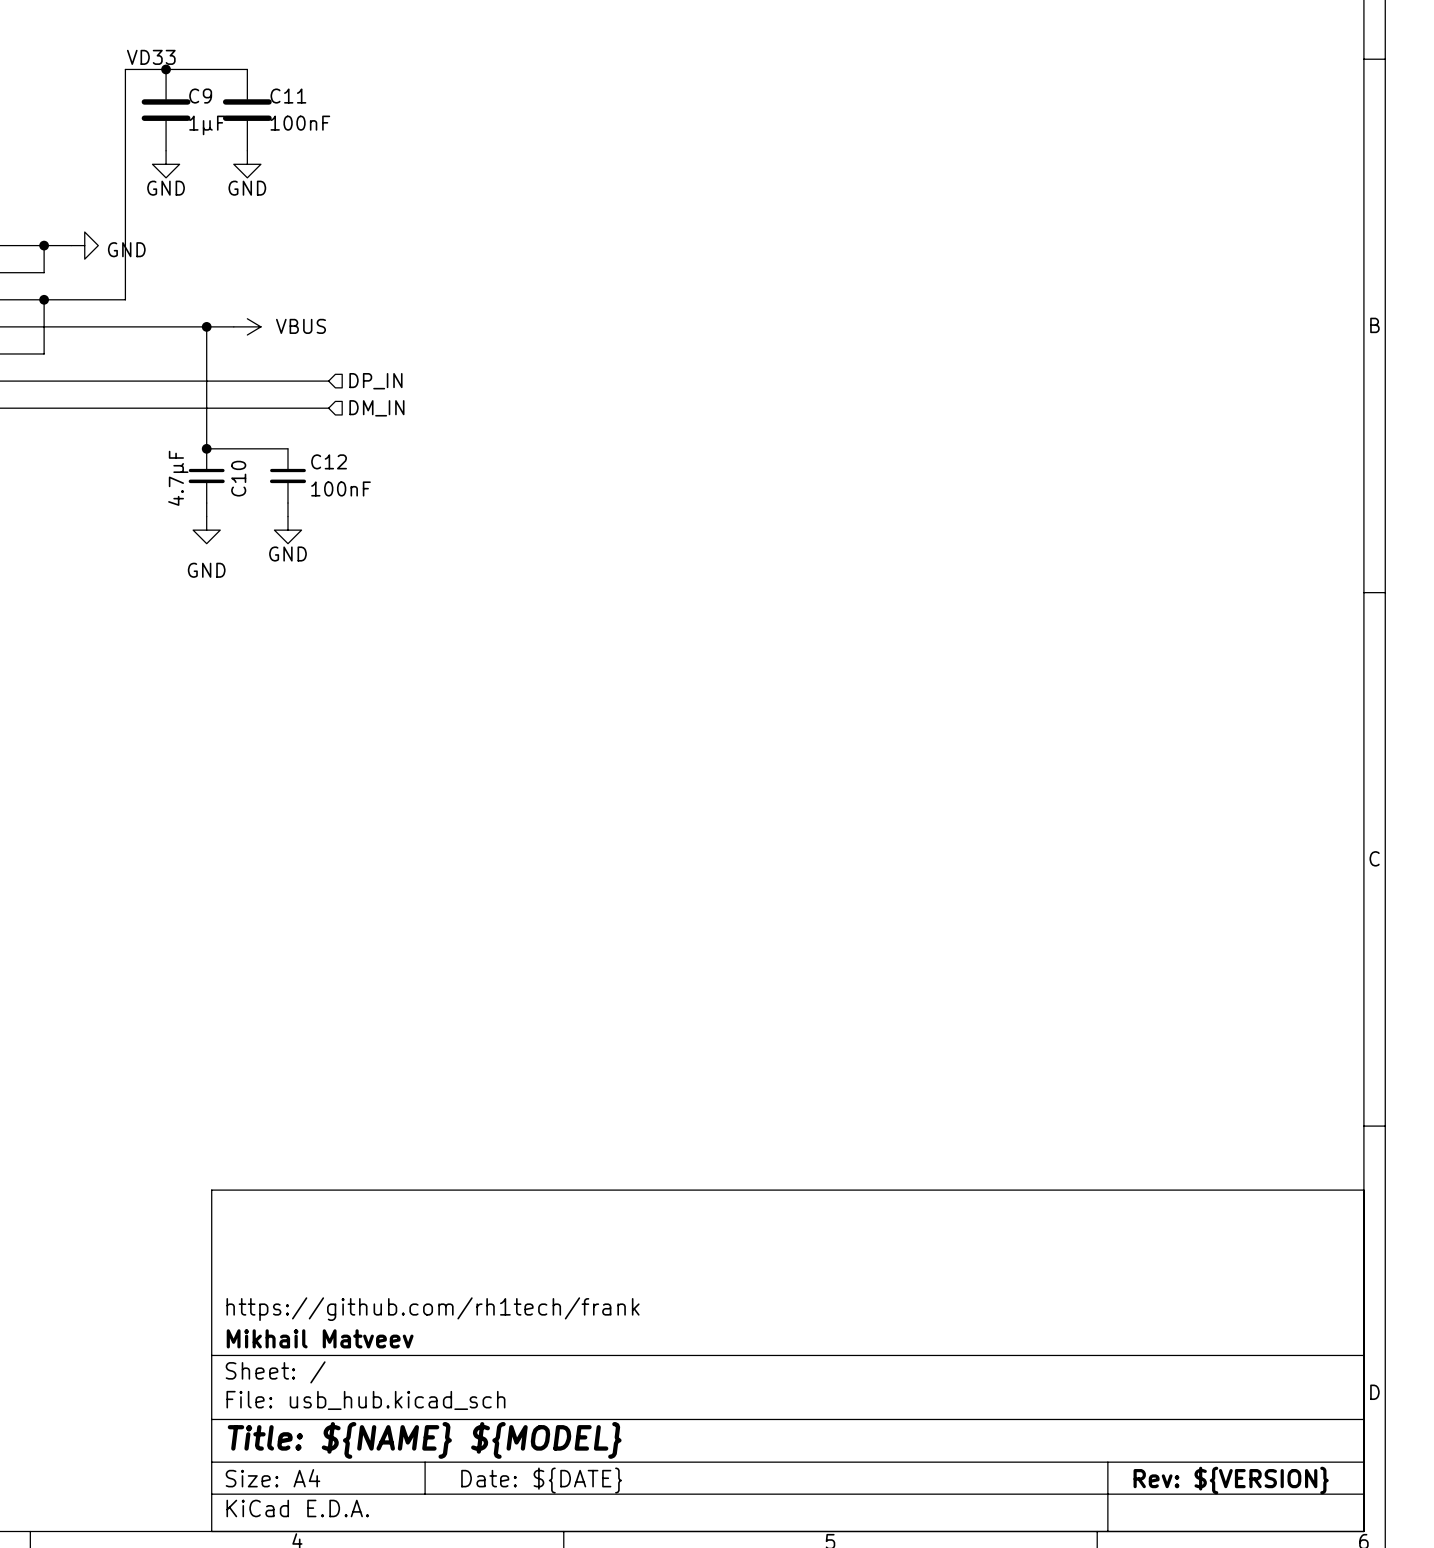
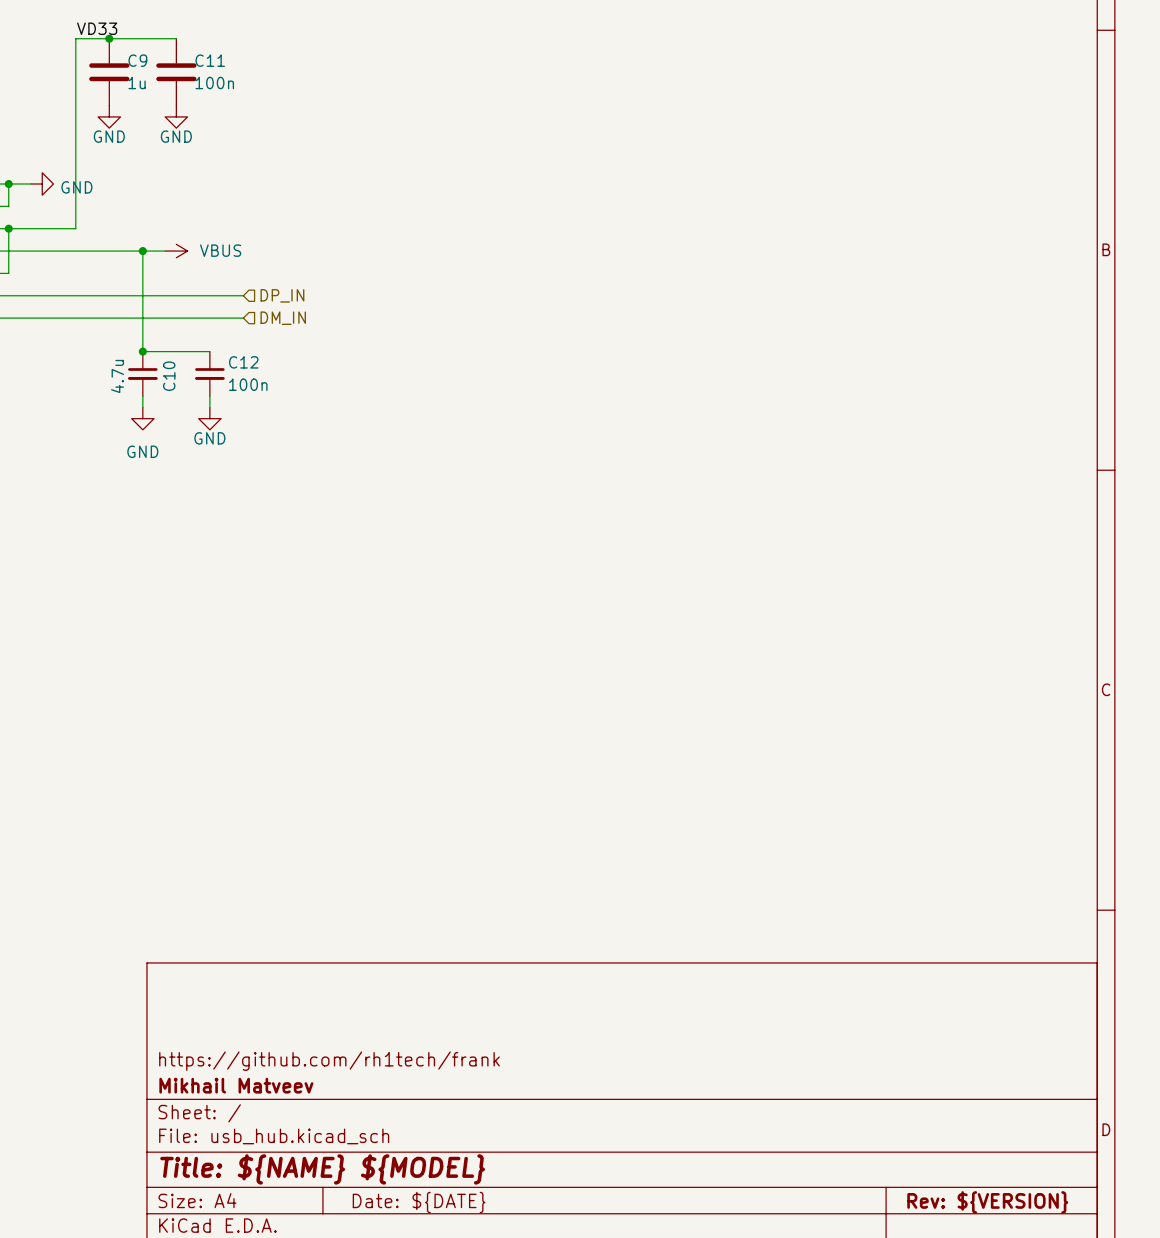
C11 value: 100nF (300, 123) -> 100n (214, 83)
C9 value: 1µF (207, 125) -> 1u (137, 83)
C10 value: 4.7µF (178, 478) -> 4.7u (117, 376)
C12 value: 100nF (341, 488) -> 100n (248, 384)

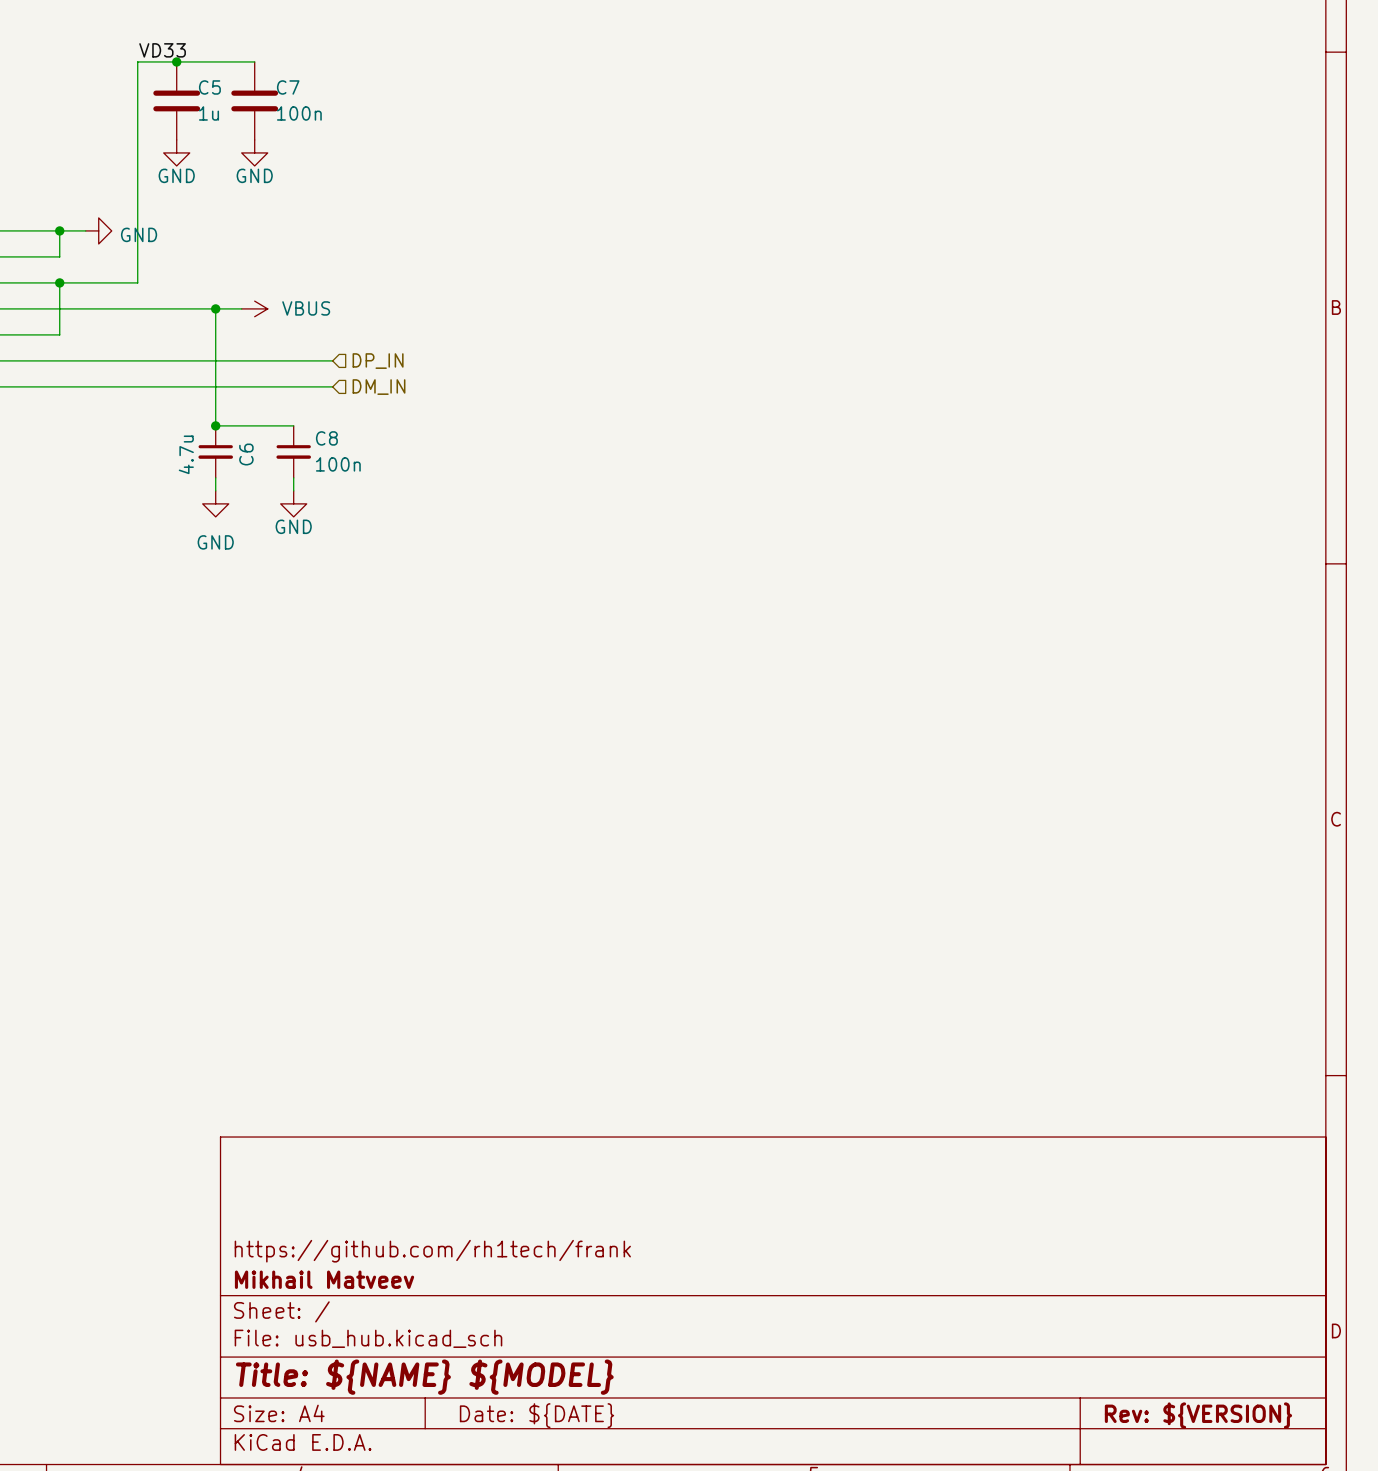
C9 name: C9 (137, 60) -> C5 (209, 87)
C11 name: C11 (210, 60) -> C7 (288, 87)
C12 name: C12 (243, 362) -> C8 (326, 438)
C10 name: C10 (169, 376) -> C6 (246, 454)

